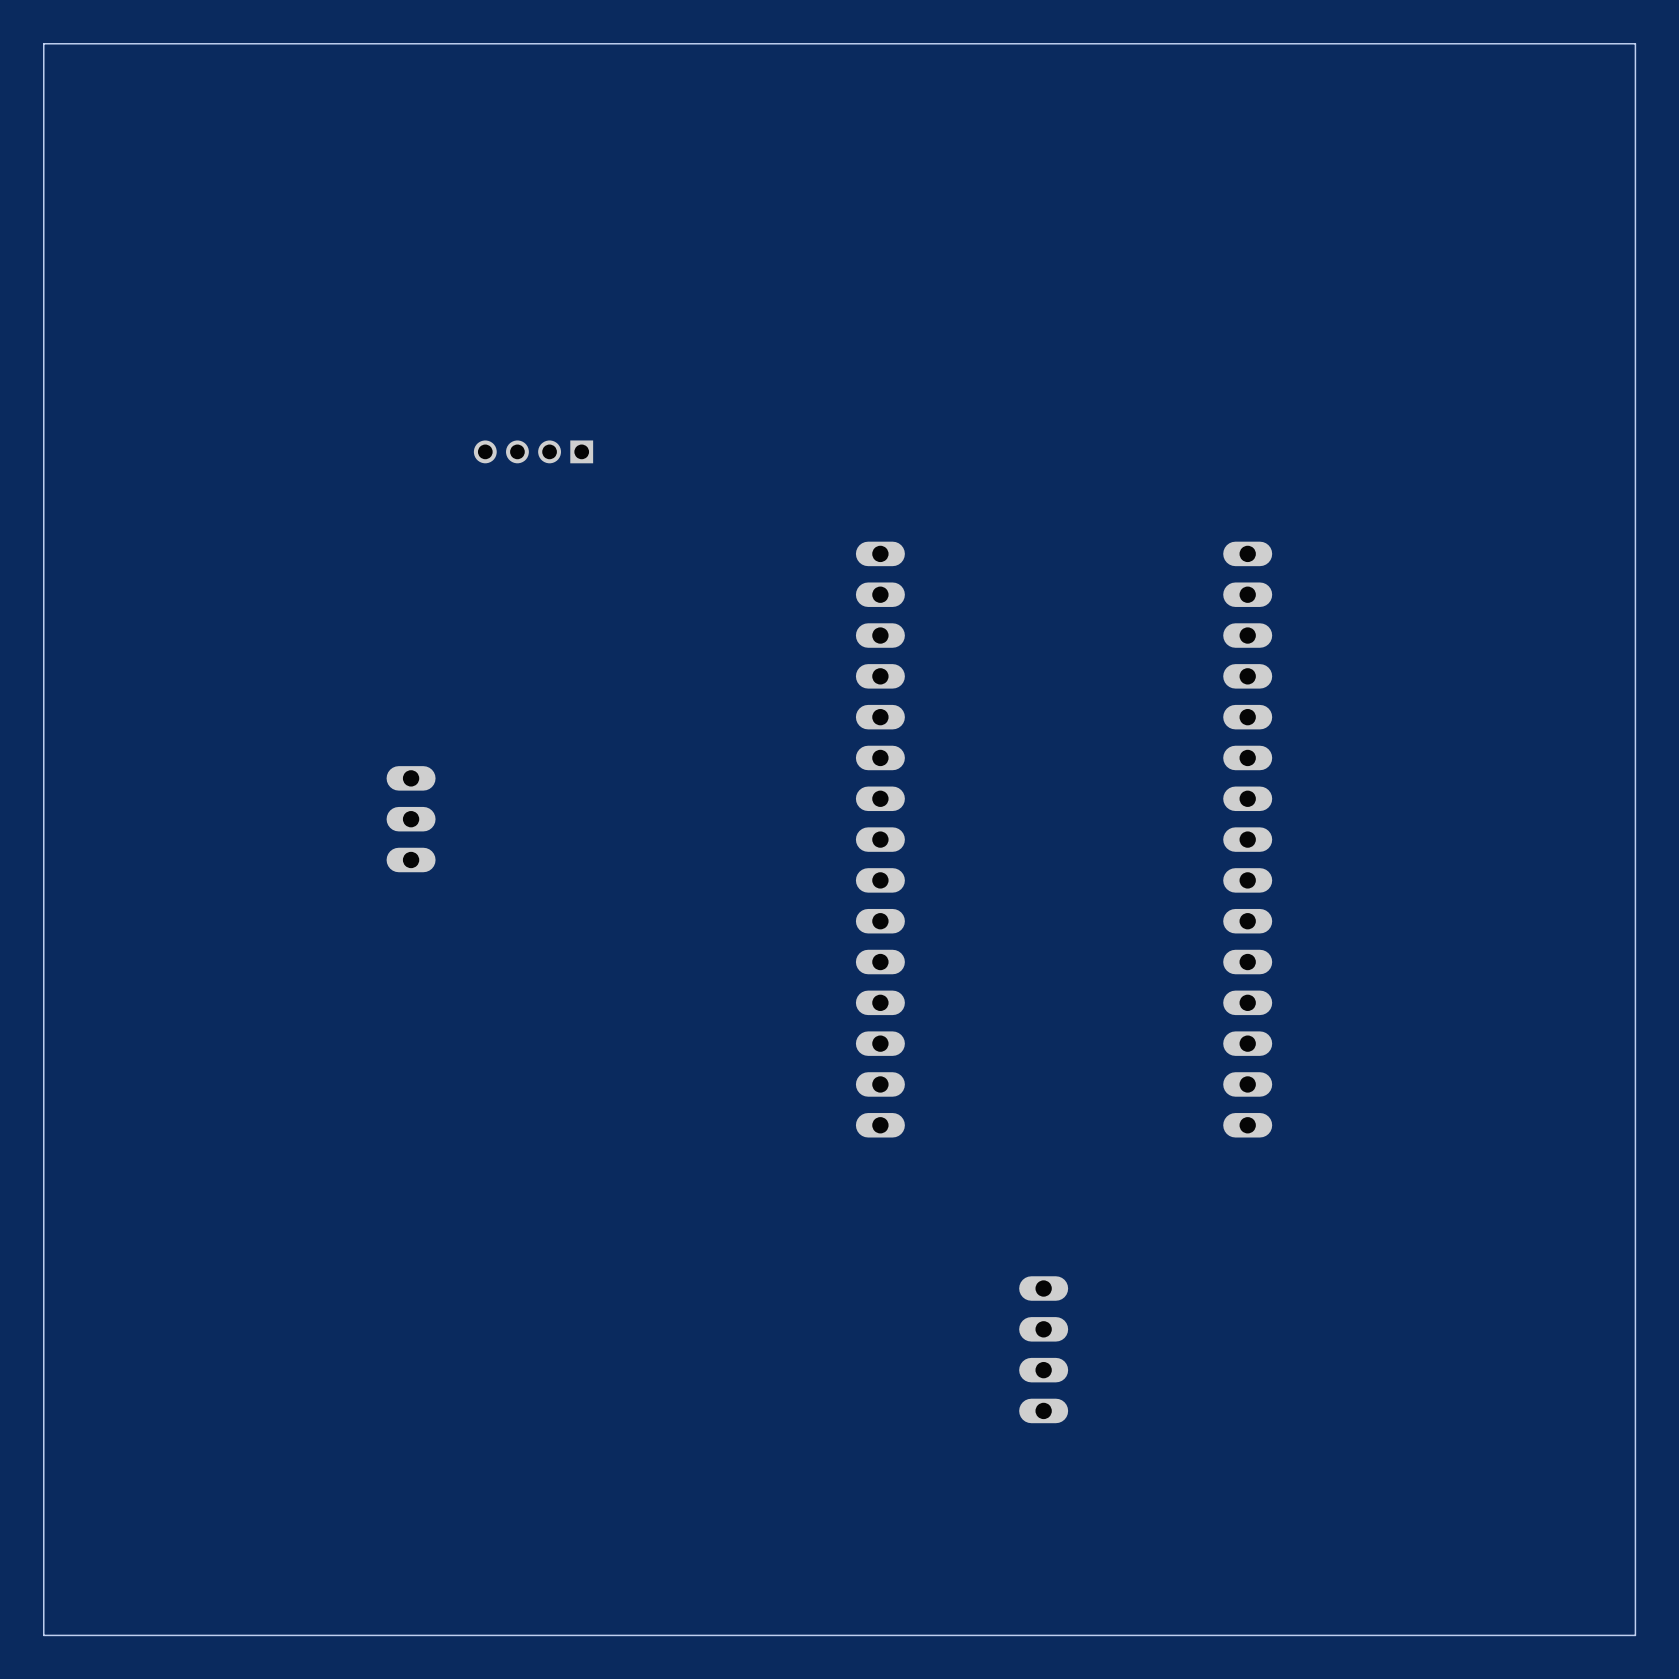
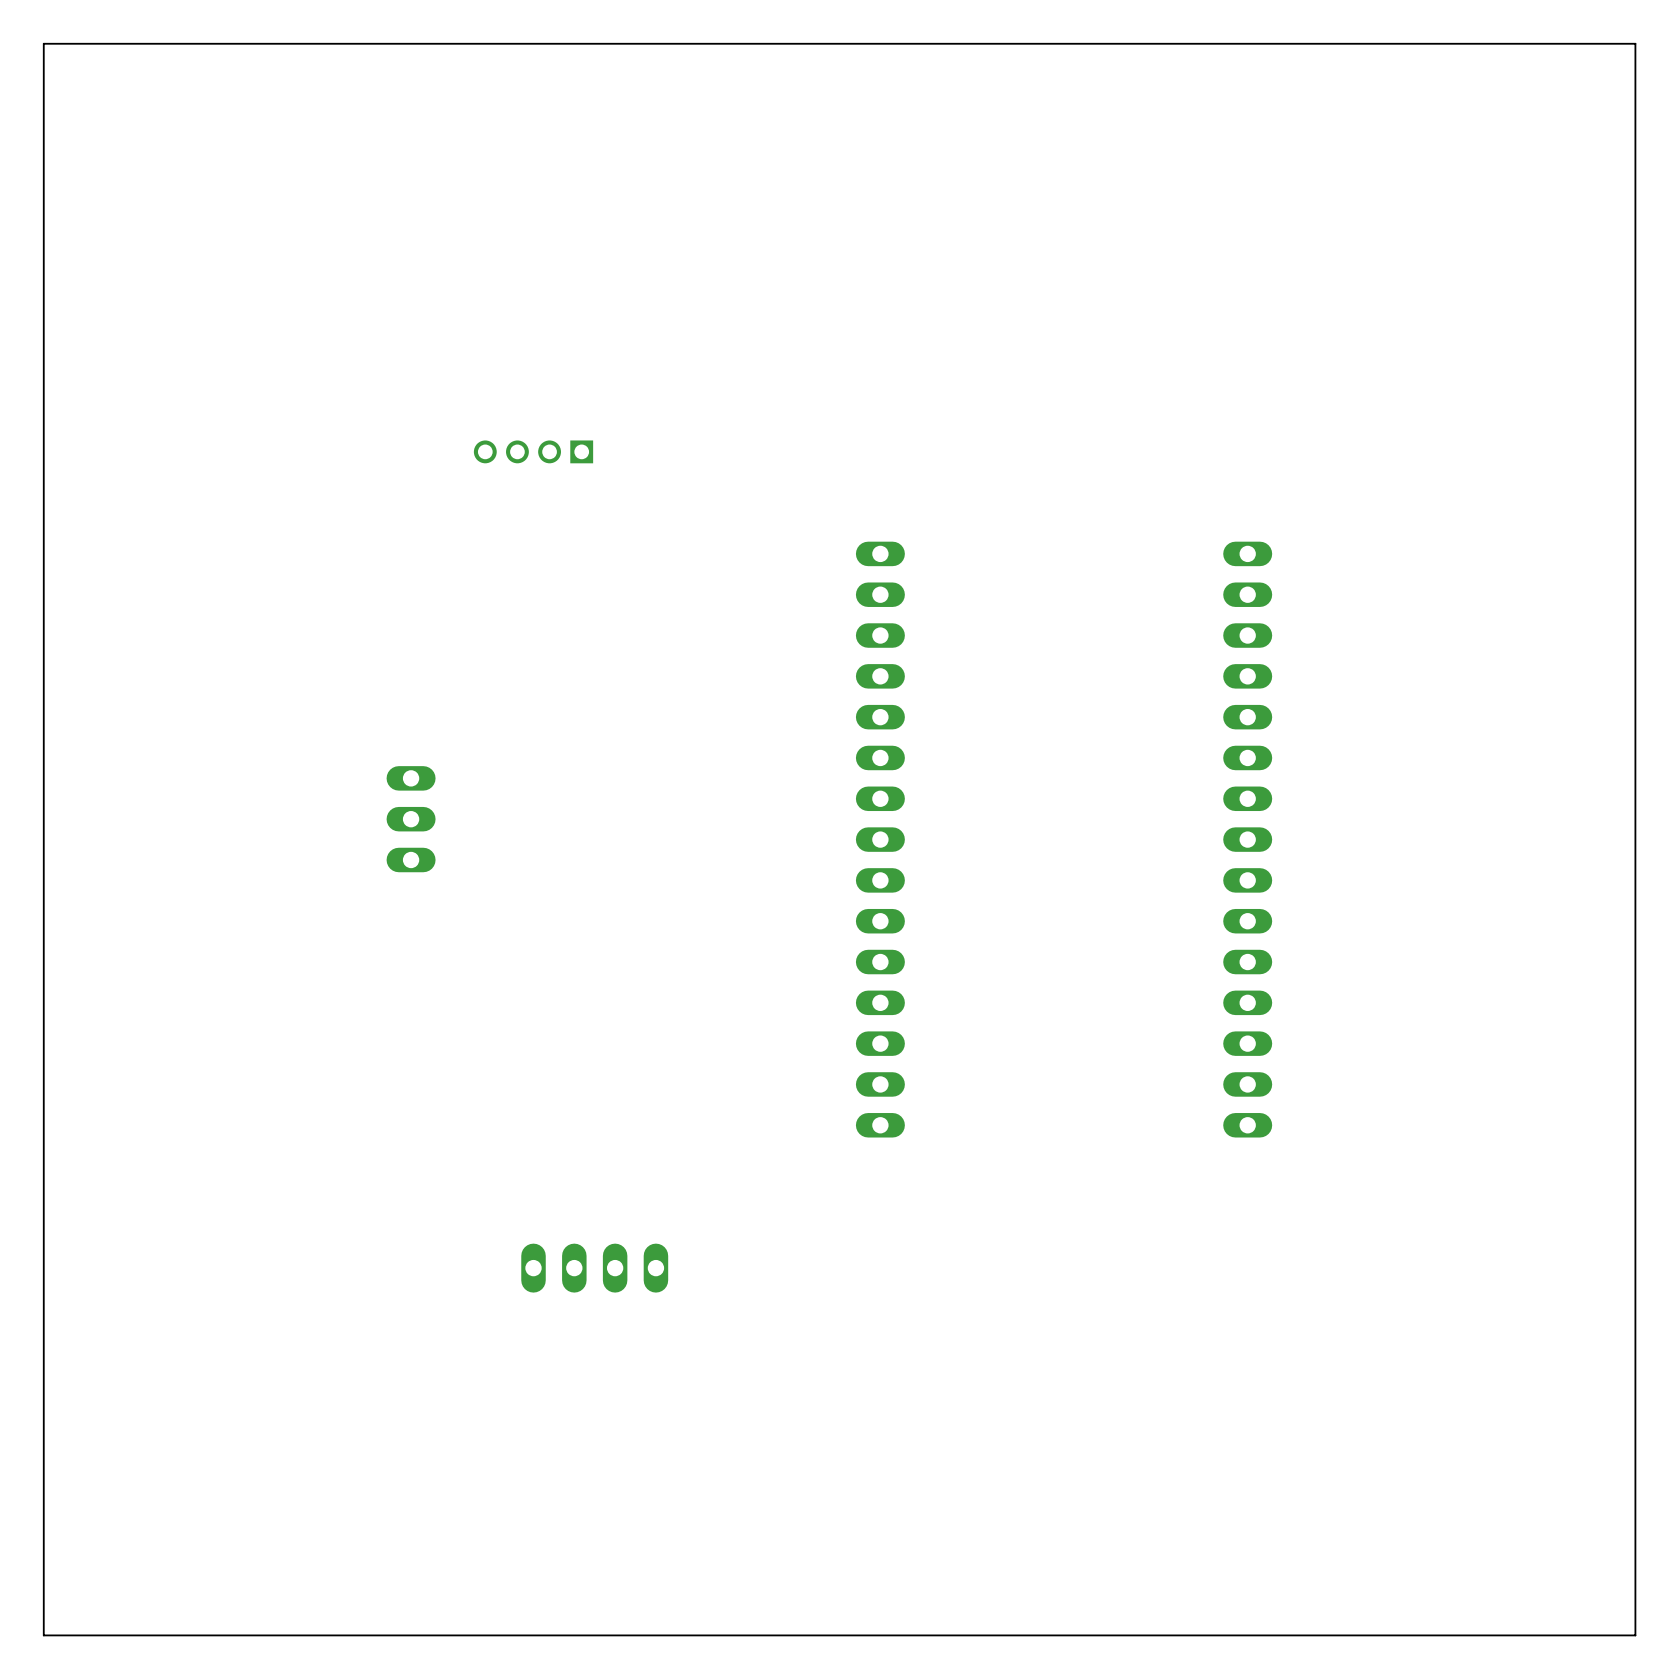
part: none -> (594, 1268)
part: (1043, 1349) -> none

